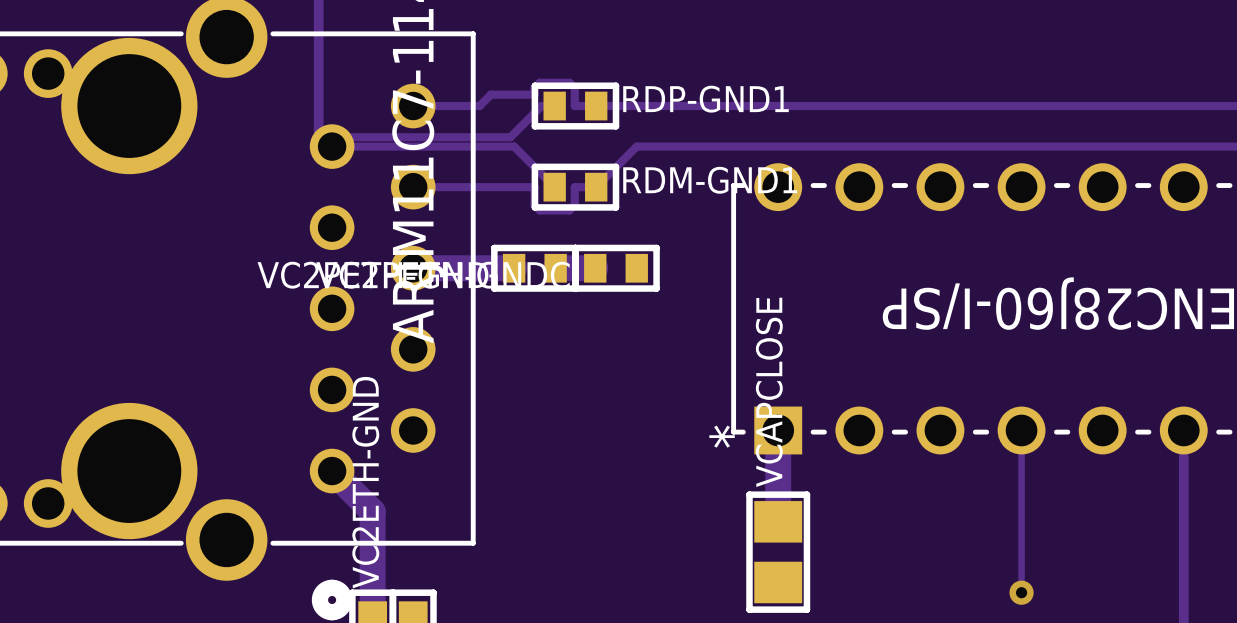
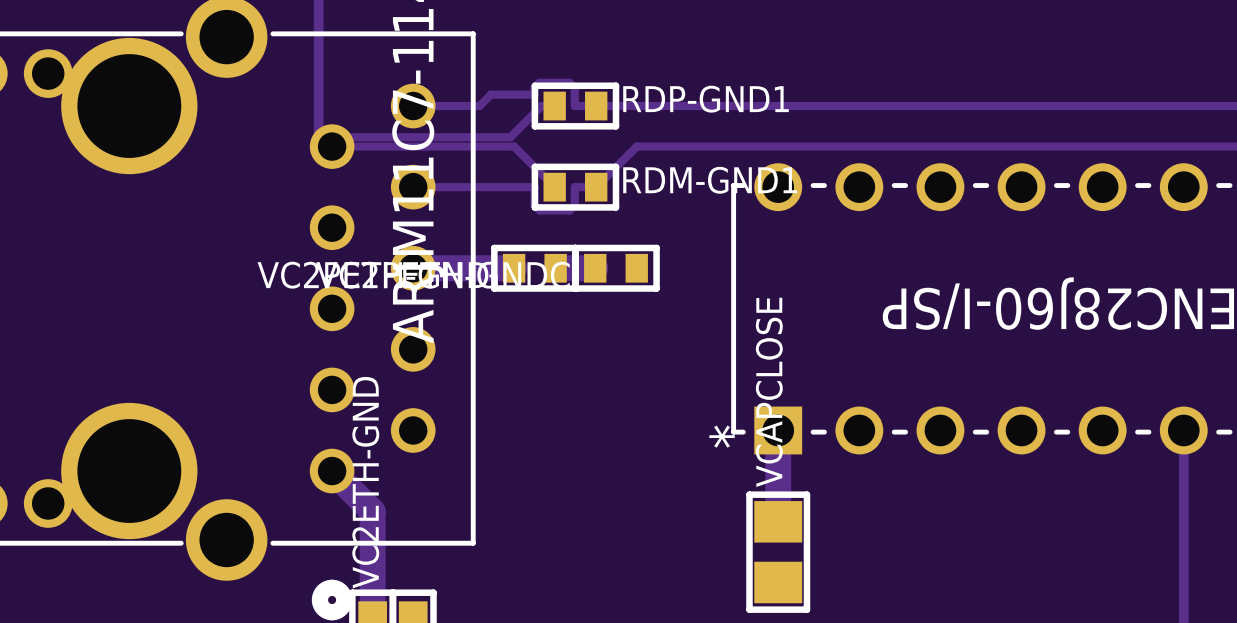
track: (1021, 430) (1021, 592) -> none
via: (1021, 592) -> none

